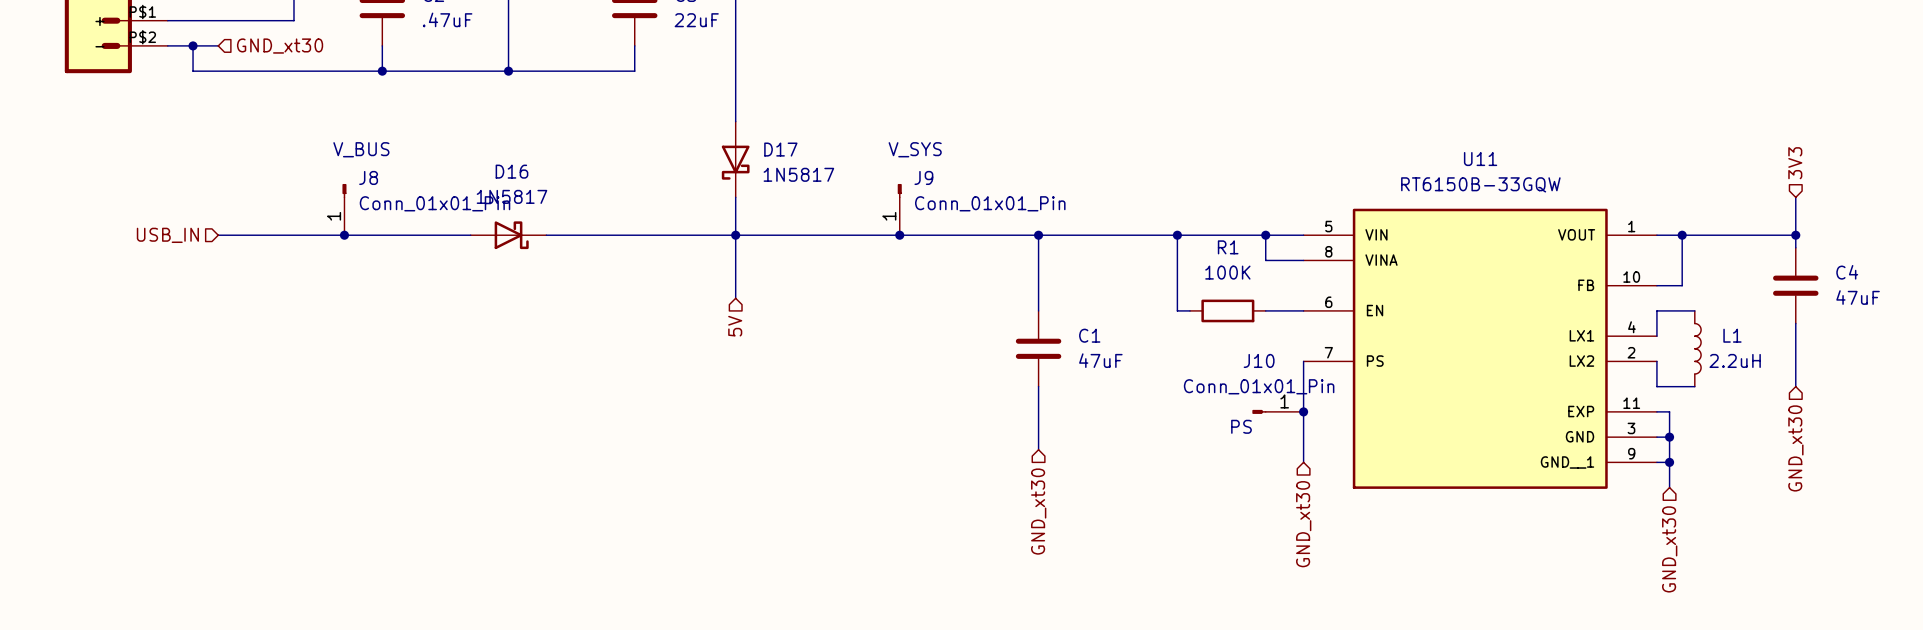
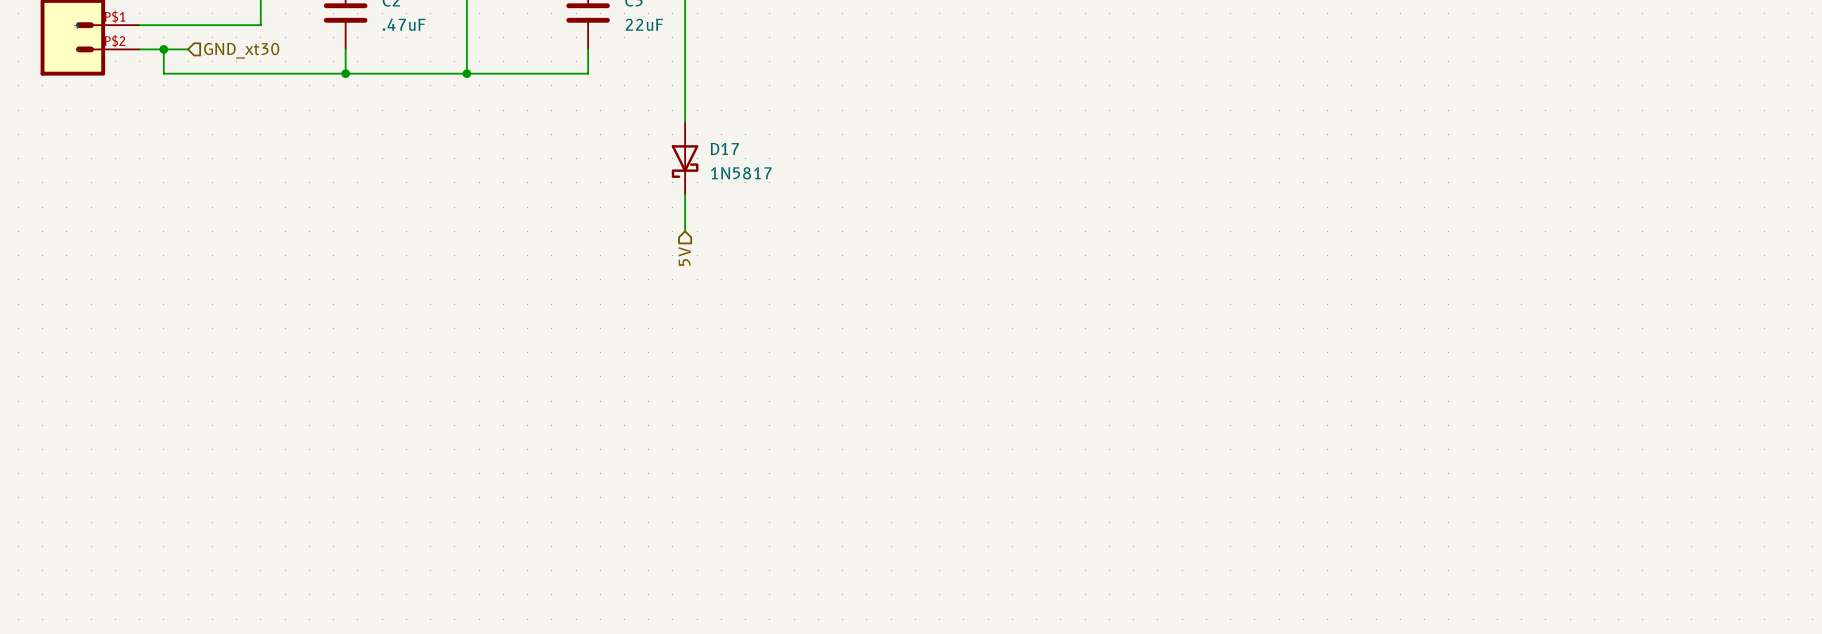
text: V_BUS (361, 149) -> none
text: V_SYS (915, 149) -> none
hierarchical label: 3V3 (1795, 163) -> none
wire: (1795, 197) (1795, 247) -> none
J8: Conn_01x01_Pin (344, 209) -> none
J9: Conn_01x01_Pin (899, 209) -> none
hierarchical label: USB_IN (167, 235) -> none
wire: (218, 235) (470, 235) -> none
junction: (344, 235) -> none
D16: 1N5817 (508, 235) -> none
wire: (546, 235) (1303, 235) -> none
wire: (735, 235) (735, 298) -> none
junction: (735, 235) -> none
junction: (899, 235) -> none
wire: (1038, 235) (1038, 310) -> none
junction: (1038, 235) -> none
wire: (1177, 235) (1177, 310) (1190, 310) -> none
junction: (1177, 235) -> none
wire: (1265, 235) (1265, 260) (1303, 260) -> none
junction: (1265, 235) -> none
wire: (1656, 235) (1795, 235) -> none
wire: (1682, 235) (1682, 285) (1656, 285) -> none
junction: (1682, 235) -> none
junction: (1795, 235) -> none
C4: 47uF (1795, 285) -> none
R1: 100K (1227, 310) -> none
wire: (1265, 310) (1303, 310) -> none
wire: (1694, 310) (1656, 310) (1656, 336) -> none
wire: (1795, 323) (1795, 386) -> none
hierarchical label position: 5V (735, 326) -> 5V (684, 256)
C1: 47uF (1038, 348) -> none
U11: RT6150B-33GQW (1480, 348) -> none
L1: 2.2uH (1697, 348) -> none
wire: (1303, 361) (1303, 462) -> none
wire: (1656, 361) (1656, 386) (1694, 386) -> none
wire: (1038, 386) (1038, 449) -> none
J10: Conn_01x01_Pin (1277, 411) -> none
junction: (1303, 411) -> none
wire: (1656, 411) (1669, 411) (1669, 487) -> none
text: PS (1241, 426) -> none
wire: (1656, 437) (1669, 437) -> none
junction: (1669, 437) -> none
hierarchical label: GND_xt30 (1795, 448) -> none
wire: (1656, 462) (1669, 462) -> none
junction: (1669, 462) -> none
hierarchical label: GND_xt30 (1038, 511) -> none
hierarchical label: GND_xt30 (1303, 524) -> none
hierarchical label: GND_xt30 (1669, 549) -> none

